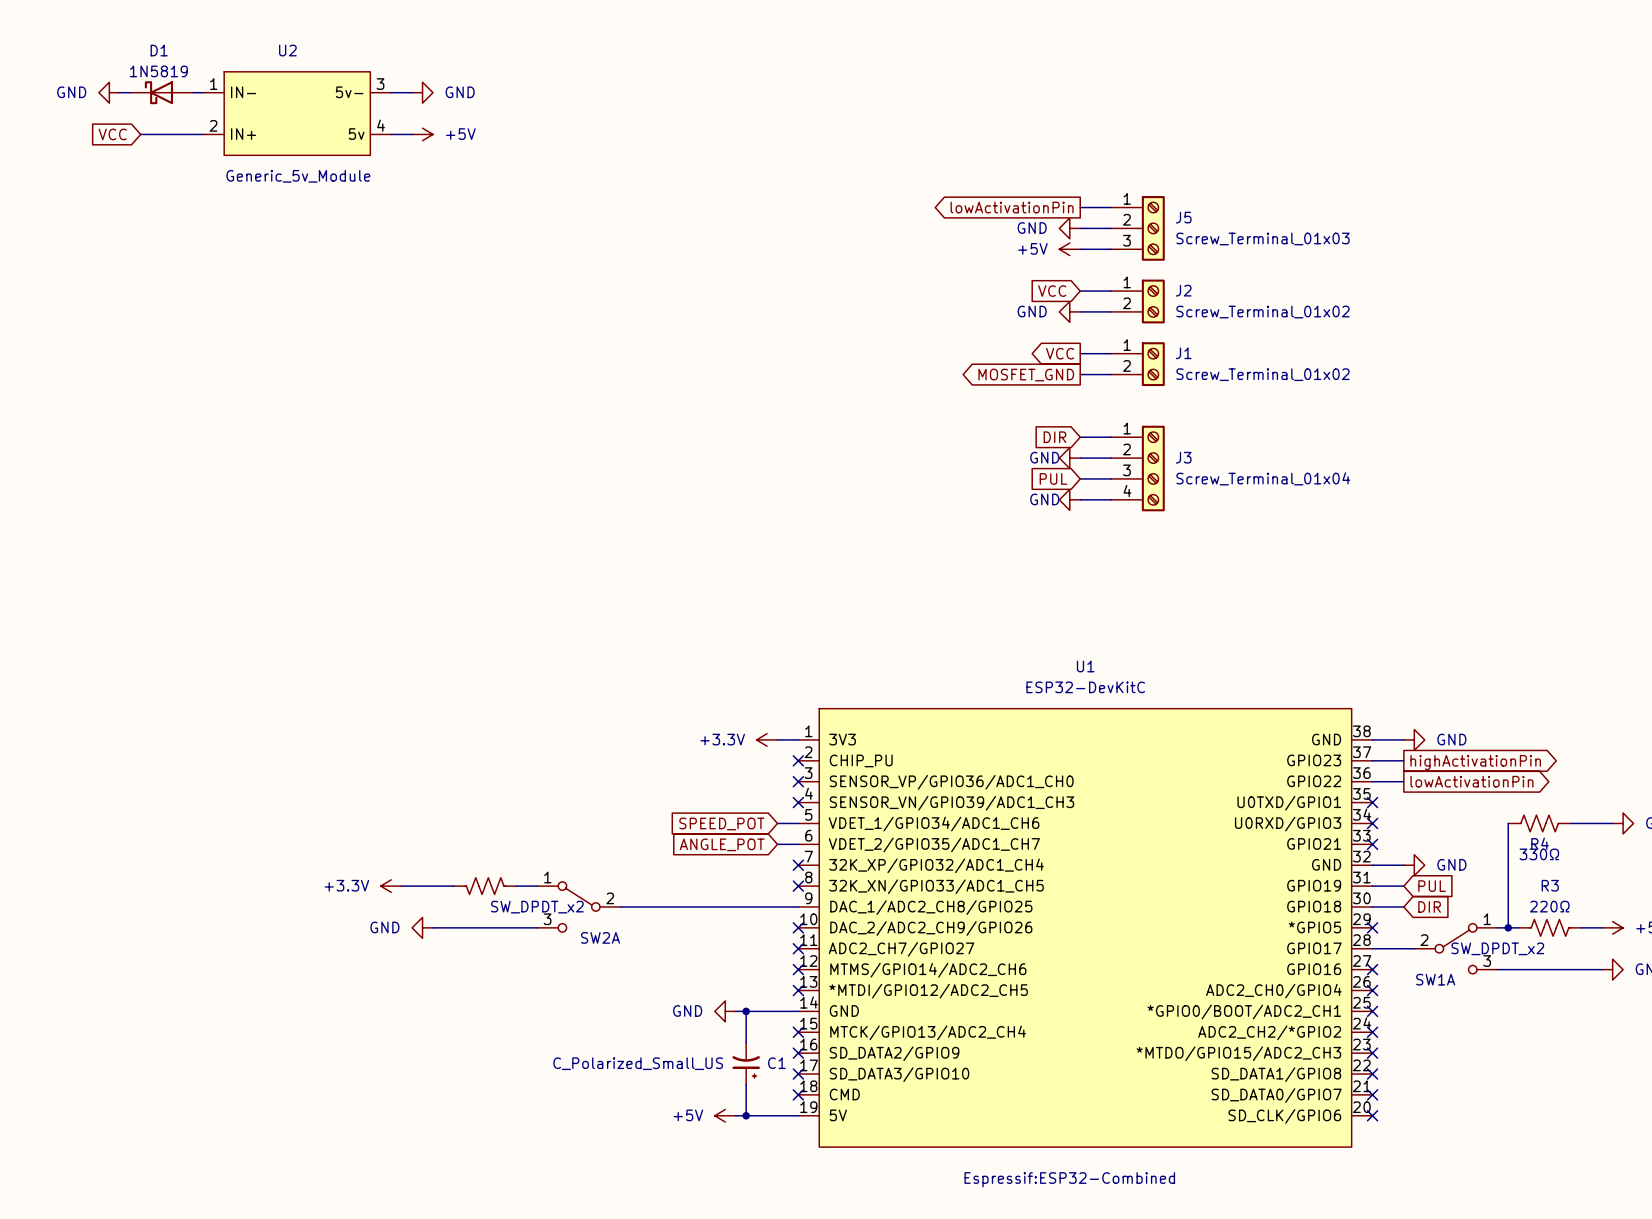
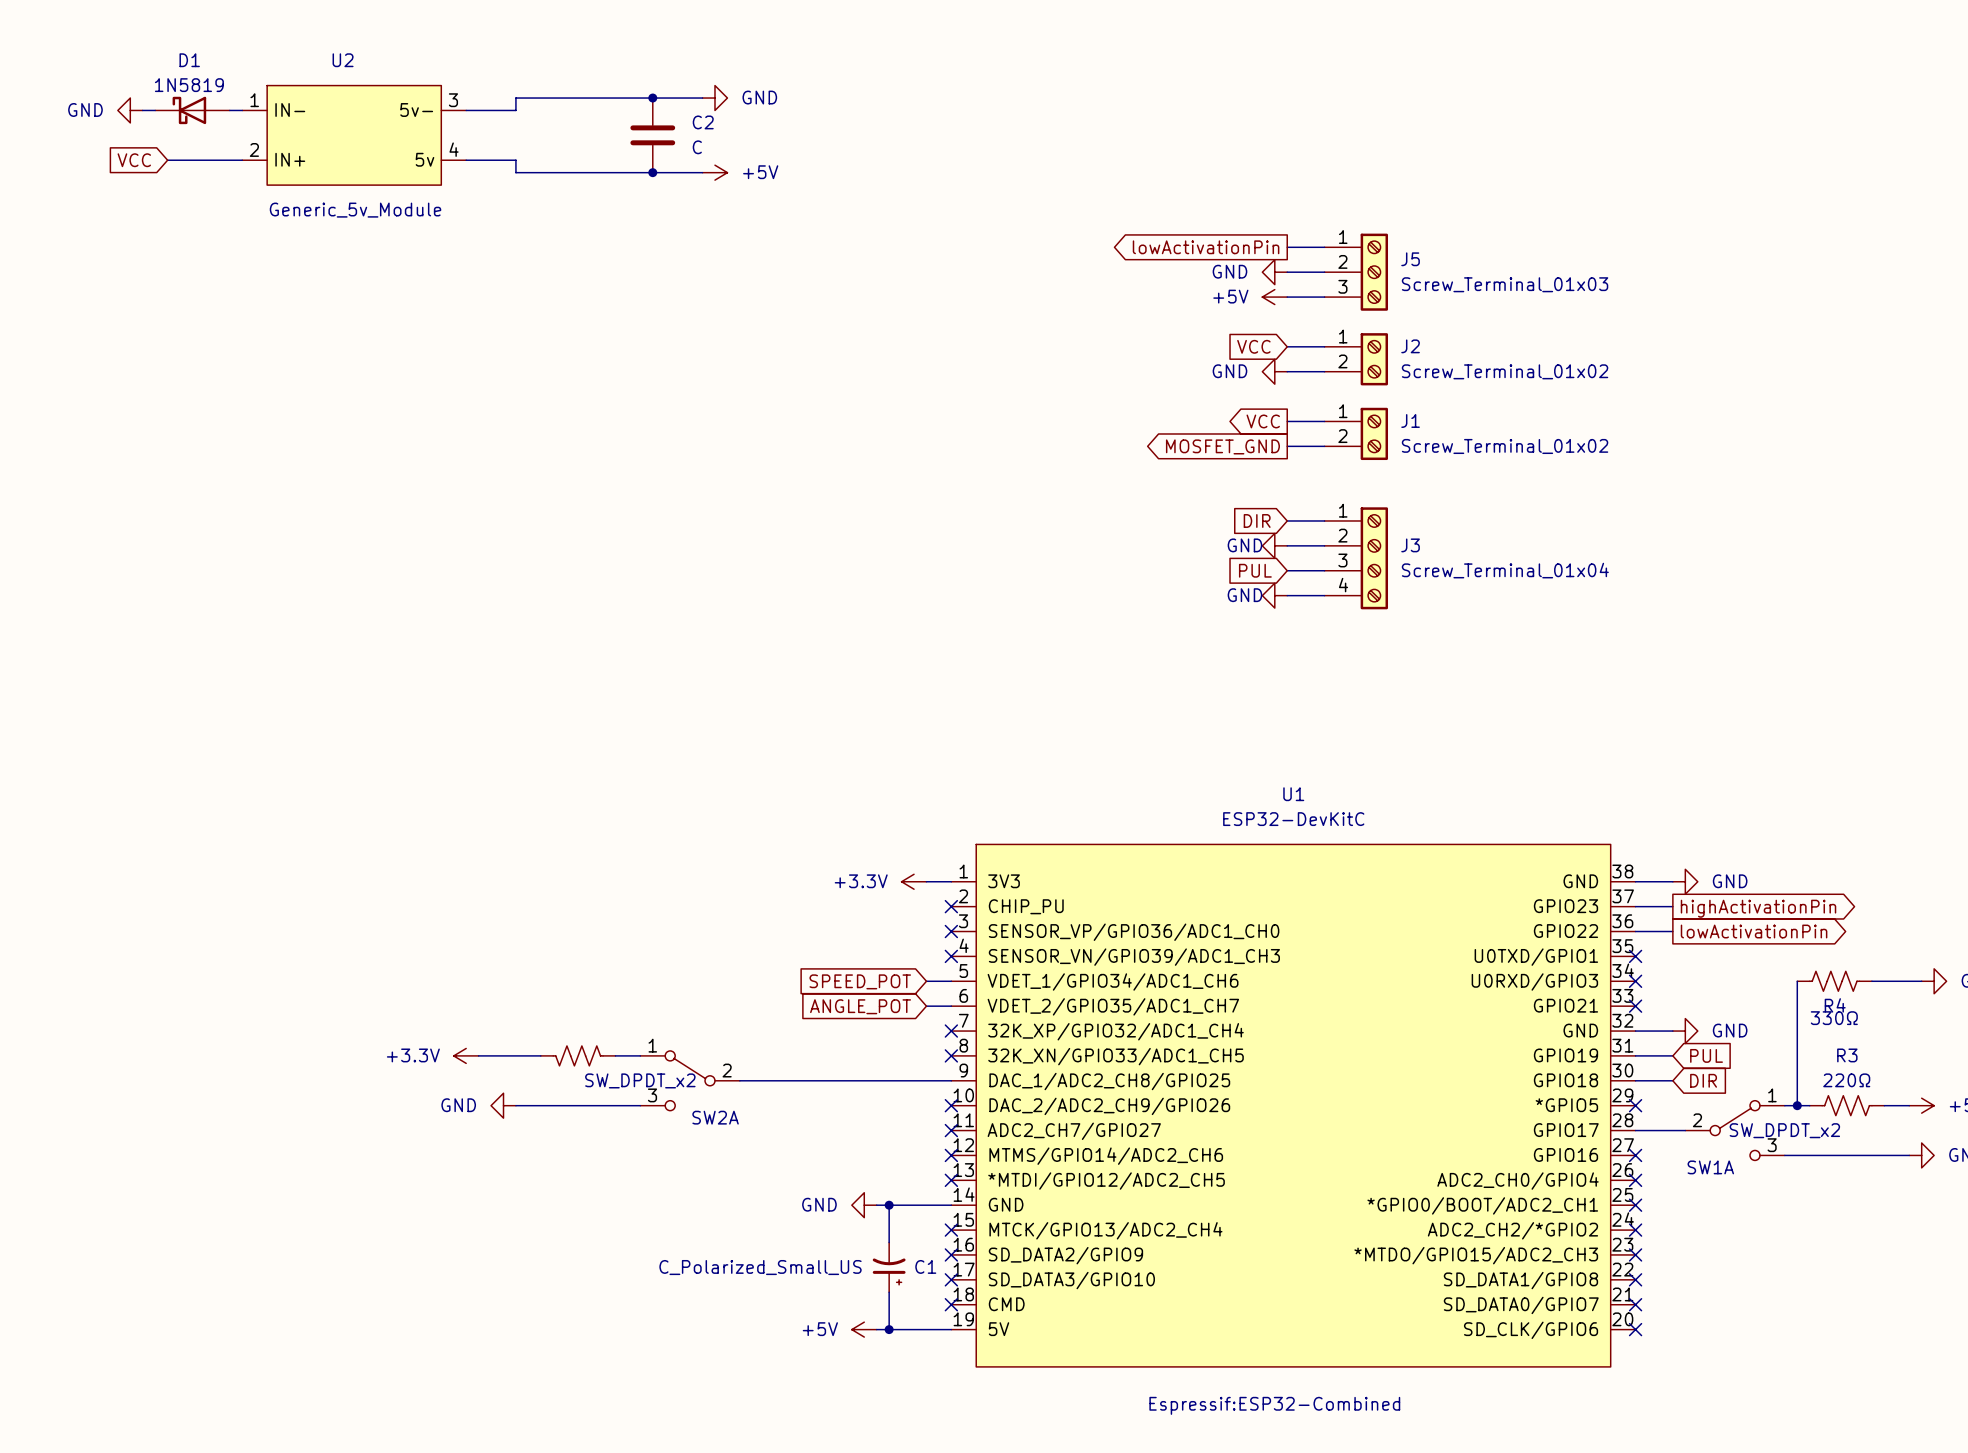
junction: none -> (652, 98)
wire: none -> (702, 98) (515, 98) (515, 110) (491, 110)
power symbol position: GND (422, 92) -> GND (714, 98)
C2: none -> C (652, 135)
wire: none -> (491, 160) (515, 160) (515, 172) (702, 172)
power symbol position: +5V (422, 134) -> +5V (714, 172)
junction: none -> (652, 172)

